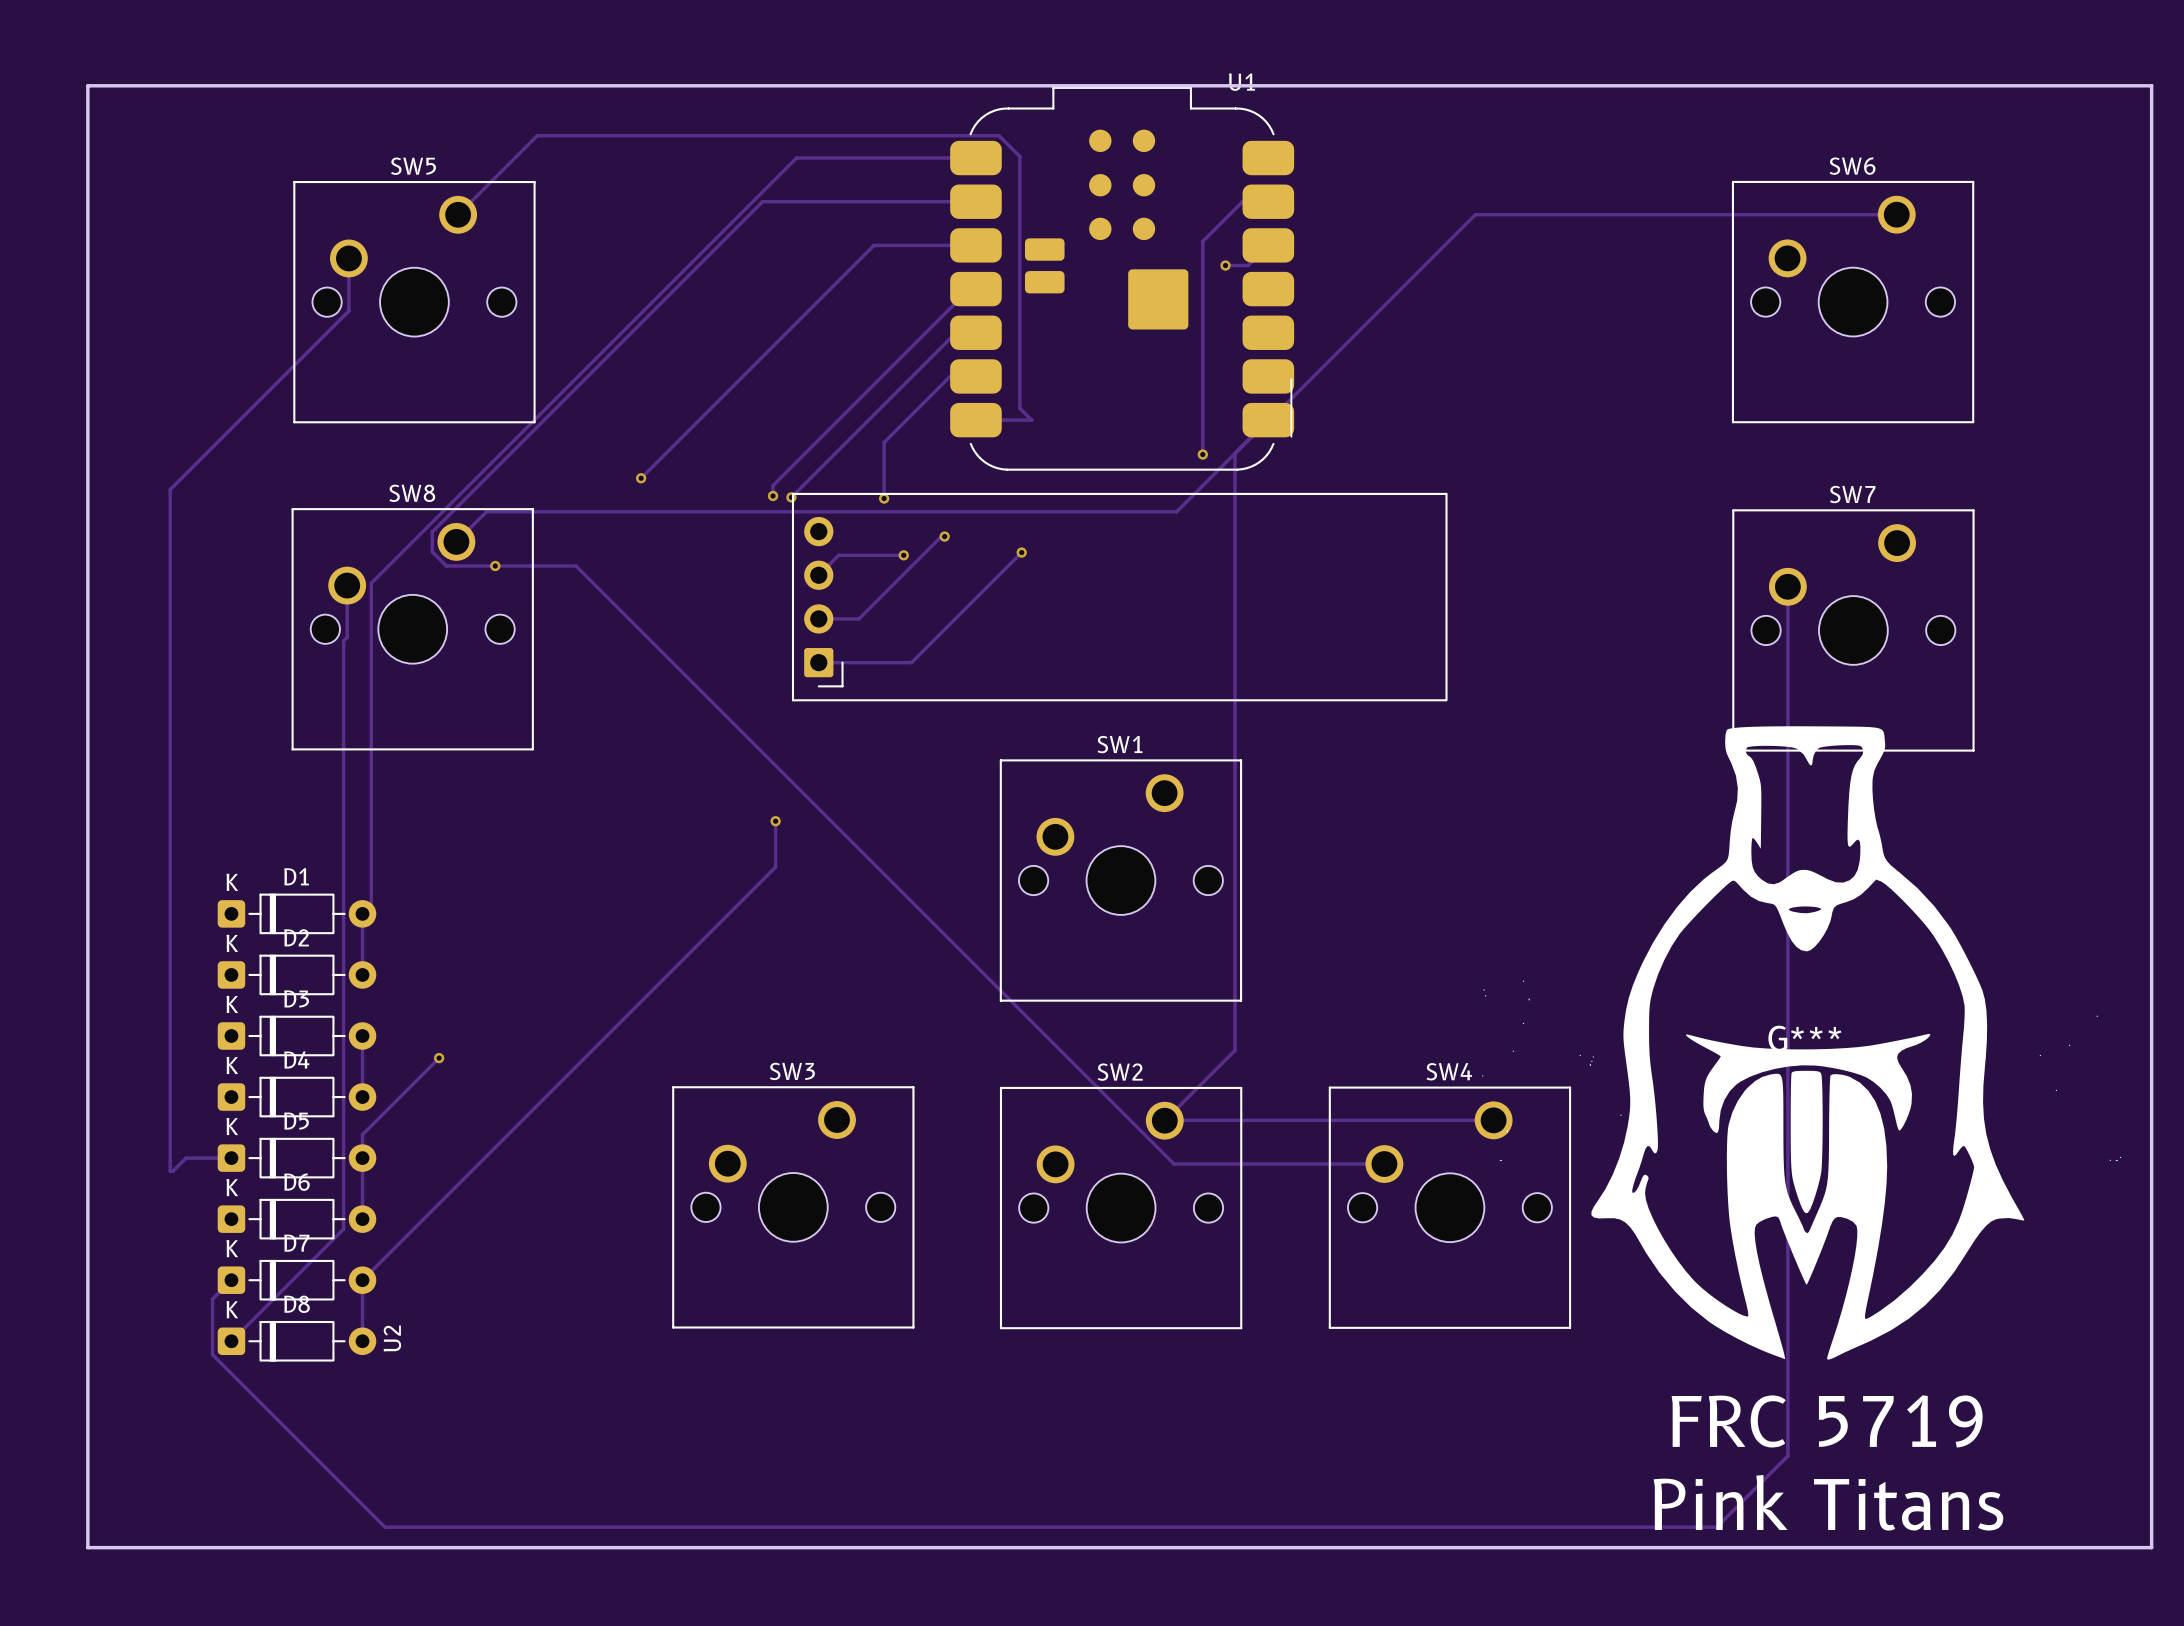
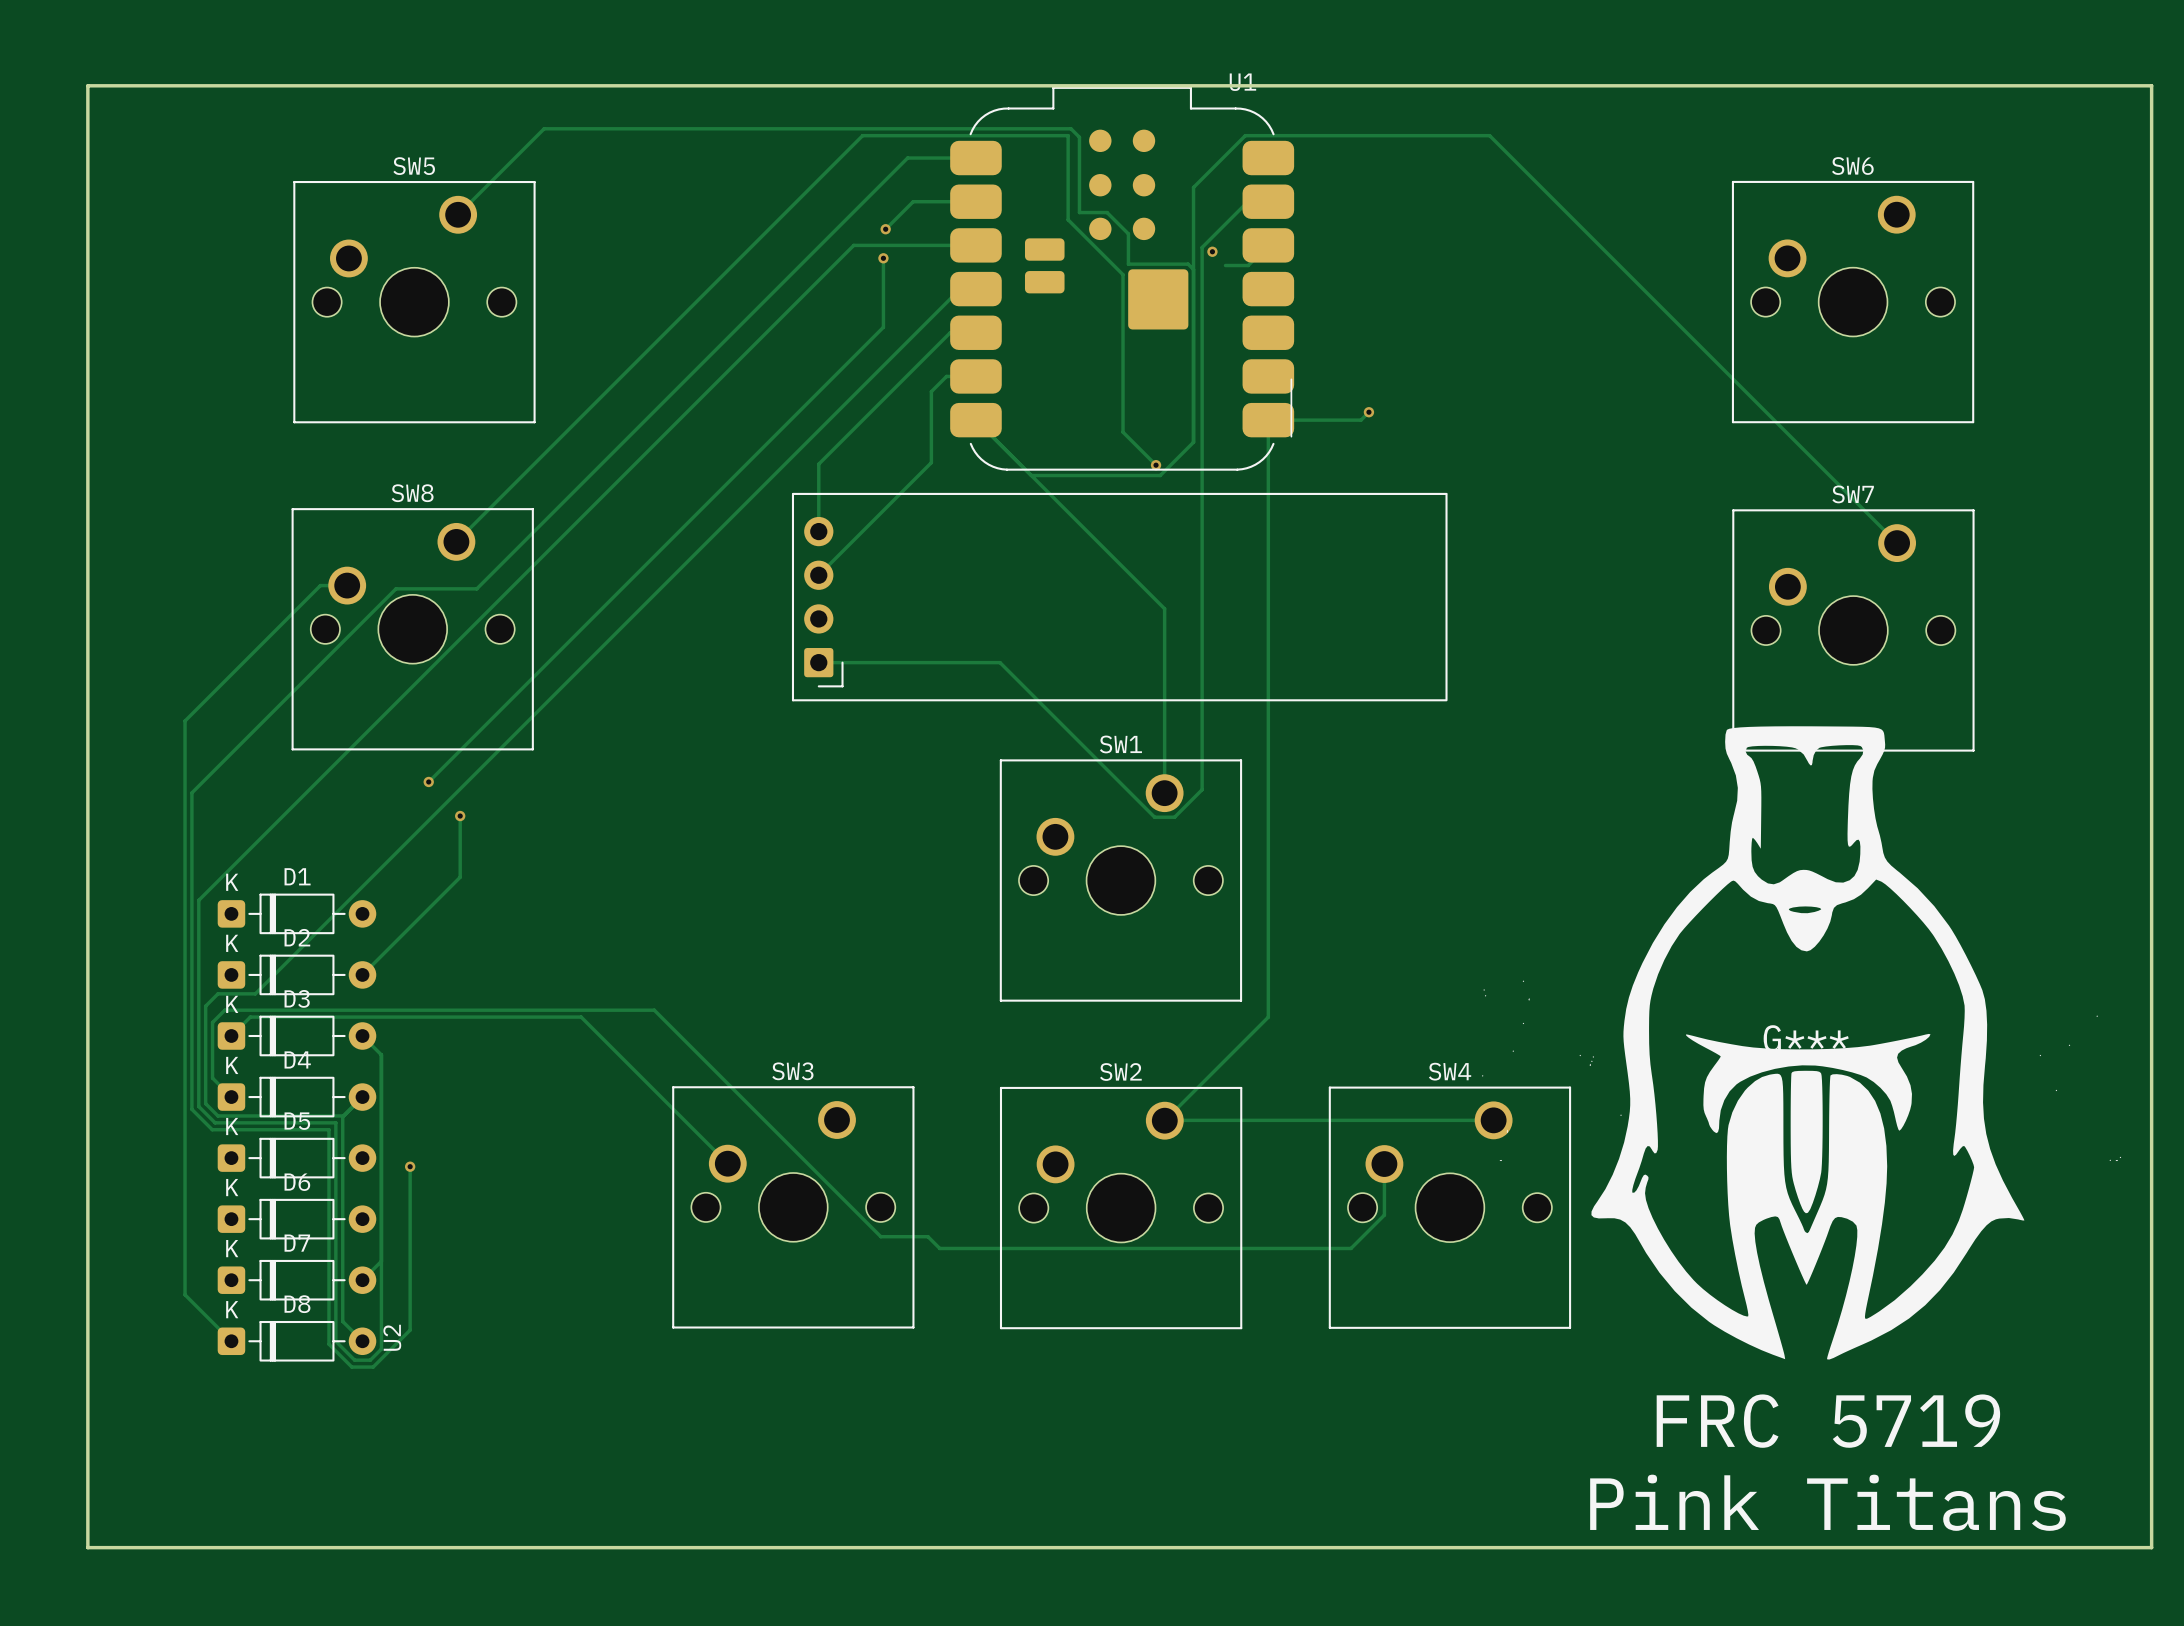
track: (537, 135) (862, 135) -> (537, 135) (544, 128) (1071, 128) (1079, 137) (1079, 212) (1107, 212) (1128, 233) (1128, 264) (1188, 264) (1193, 269)
track: (998, 135) (1019, 156) (1019, 408) (1031, 420) (975, 420) -> (998, 135) (1068, 135) (1068, 219) (1123, 274) (1123, 432) (1156, 465)
track: (907, 158) (796, 158) (371, 583) (371, 905) (362, 913) (362, 974) -> (907, 158) (476, 588) (395, 588) (191, 792) (191, 1109) (212, 1129) (328, 1129) (328, 1344) (351, 1367) (373, 1367) (410, 1330) (410, 1166)
track: (913, 201) (762, 201) (432, 531) (432, 551) (446, 565) (576, 565) (1174, 1164) (1384, 1164) -> (913, 201) (885, 229)
track: (1247, 201) (1242, 201) (1202, 241) (1202, 454) -> (1247, 201) (1202, 247) (1202, 789) (1174, 817) (1154, 817) (1000, 662) (911, 662)
track: (1896, 214) (1475, 214) (1270, 420) -> (1368, 412) (1361, 420) (1270, 420)
via: none -> (885, 229)
track: (873, 245) (641, 478) -> (873, 245) (853, 245) (198, 900) (198, 1106) (215, 1122) (335, 1122) (335, 1341) (354, 1360) (370, 1360) (381, 1349) (381, 1054) (362, 1035)
track: (348, 258) (348, 310) (170, 489) (170, 1171) (172, 1171) (186, 1158) (231, 1158) -> none
track: none -> (883, 258) (883, 327) (428, 781)
via: none -> (883, 258)
via position: (1225, 265) -> (1212, 251)
track: (969, 289) (773, 485) (773, 495) -> (969, 289) (960, 289) (255, 993) (217, 993) (205, 1006) (205, 1103) (217, 1115) (343, 1115)
track: (956, 332) (791, 497) -> (956, 332) (950, 332) (818, 464) (818, 531)
track: (950, 376) (884, 442) (884, 498) -> (950, 376) (946, 376) (931, 391) (931, 462) (838, 555)
via: none -> (1368, 412)
track: none -> (975, 420) (1164, 608) (1164, 793)
track: (1268, 420) (1176, 511) (486, 511) -> (862, 135) (486, 511)
track: (1234, 453) (1234, 1050) -> (1268, 420) (1268, 1017) (1234, 1050)
via position: (1202, 454) -> (1156, 465)
track: none -> (1031, 475) (1160, 475) (1193, 442) (1193, 187) (1245, 135) (1489, 135) (1897, 543)
via: (641, 478) -> none
via: (773, 495) -> none
via: (791, 497) -> none
via: (884, 498) -> none
via: (944, 536) -> none
track: (945, 536) (941, 536) (858, 618) (818, 618) -> none
track: (1021, 552) (911, 662) -> none
via: (1021, 552) -> none
track: (838, 555) (903, 555) -> none
via: (903, 555) -> none
via: (495, 565) -> none
track: (347, 585) (347, 637) (343, 640) (343, 1229) (231, 1341) -> (347, 585) (320, 585) (185, 721) (185, 1294) (231, 1341)
track: (1787, 586) (1787, 1455) (1716, 1527) (384, 1527) (212, 1354) (212, 1299) (231, 1280) -> none
via: none -> (428, 781)
track: none -> (460, 816) (460, 877) (362, 974)
via: none -> (460, 816)
track: (775, 820) (775, 867) (381, 1261) -> none
via: (775, 821) -> none
track: none -> (231, 1035) (250, 1017) (581, 1017) (727, 1163)
track: (362, 1035) (362, 1097) -> none
track: (439, 1058) (362, 1134) (362, 1219) -> none
via: (439, 1058) -> none
track: none -> (231, 1097) (212, 1078) (212, 1022) (224, 1010) (654, 1010) (880, 1236) (927, 1236) (939, 1248) (1351, 1248) (1384, 1215) (1384, 1164)
via: none -> (410, 1166)
track: (362, 1280) (362, 1341) -> (362, 1097) (342, 1116) (342, 1321) (362, 1341)

